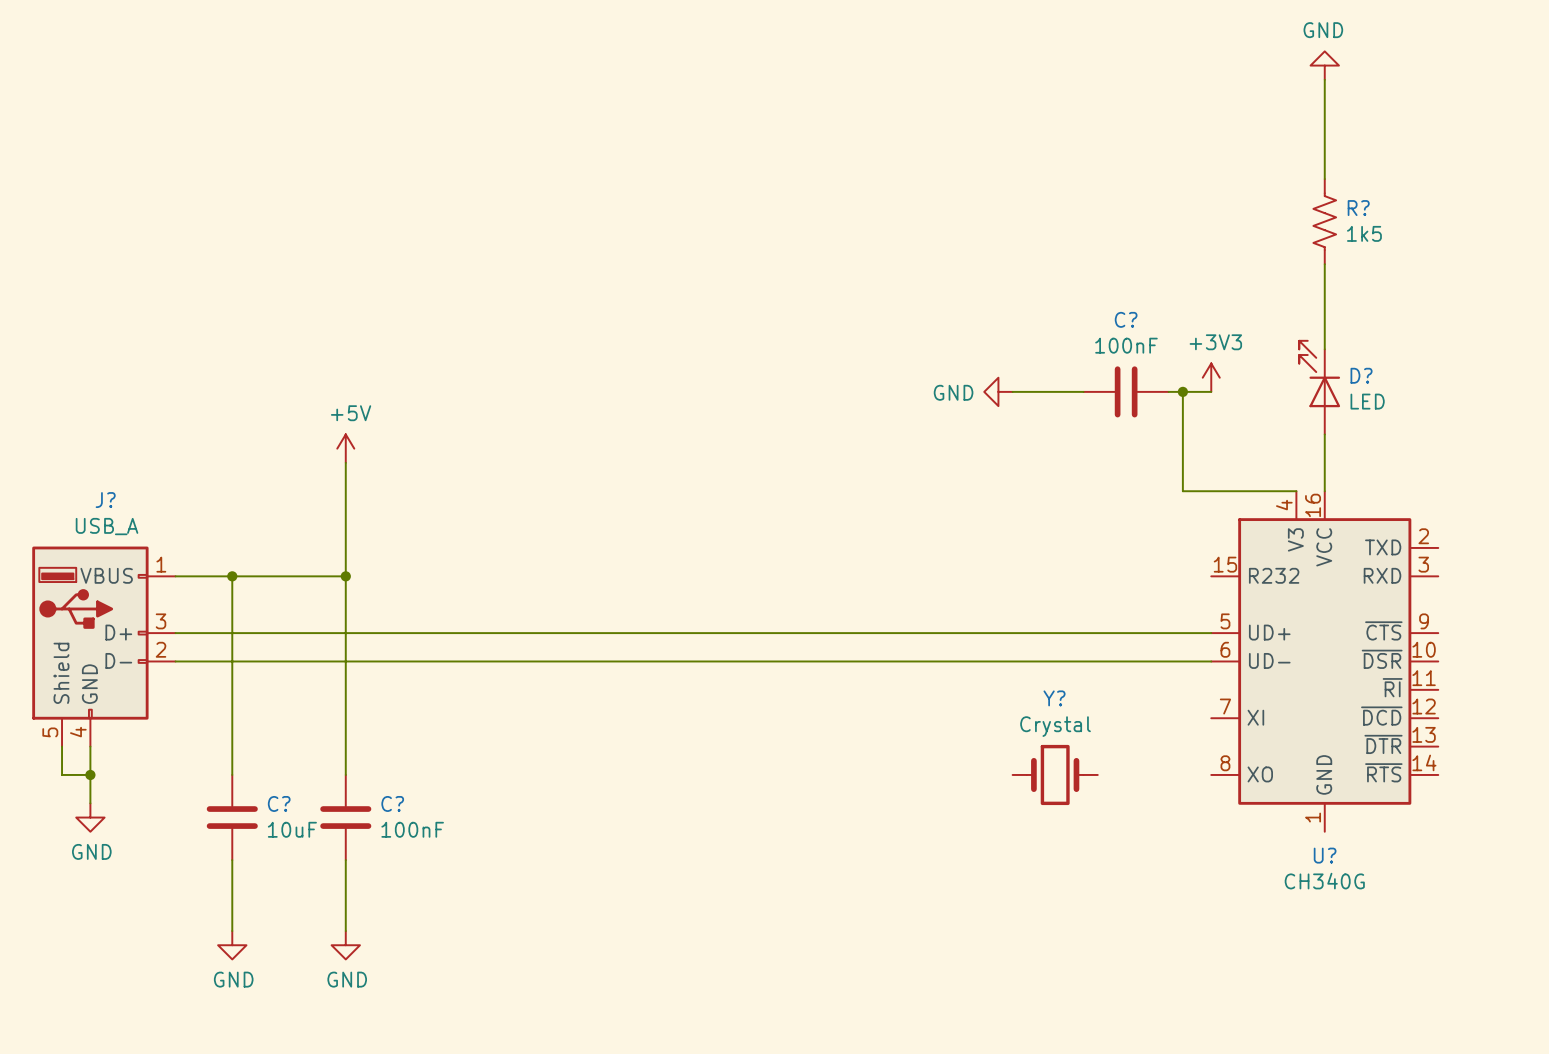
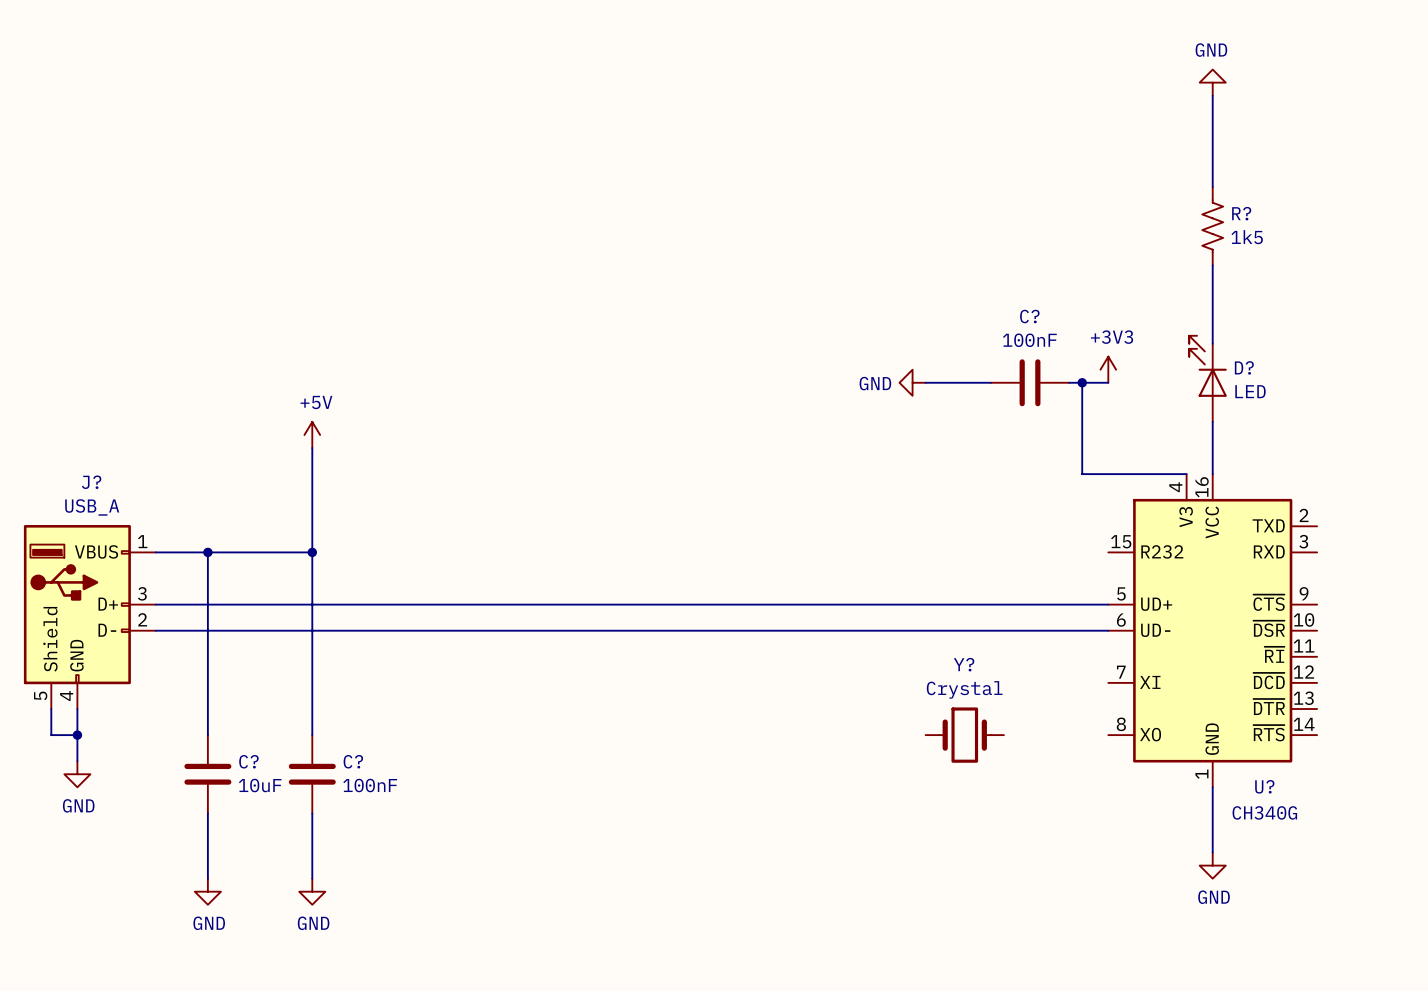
wire: none -> (1212, 787) (1212, 852)
U? name position: U? (1325, 855) -> U? (1264, 786)
U? value position: CH340G (1324, 881) -> CH340G (1264, 812)
power symbol: none -> GND (1212, 865)

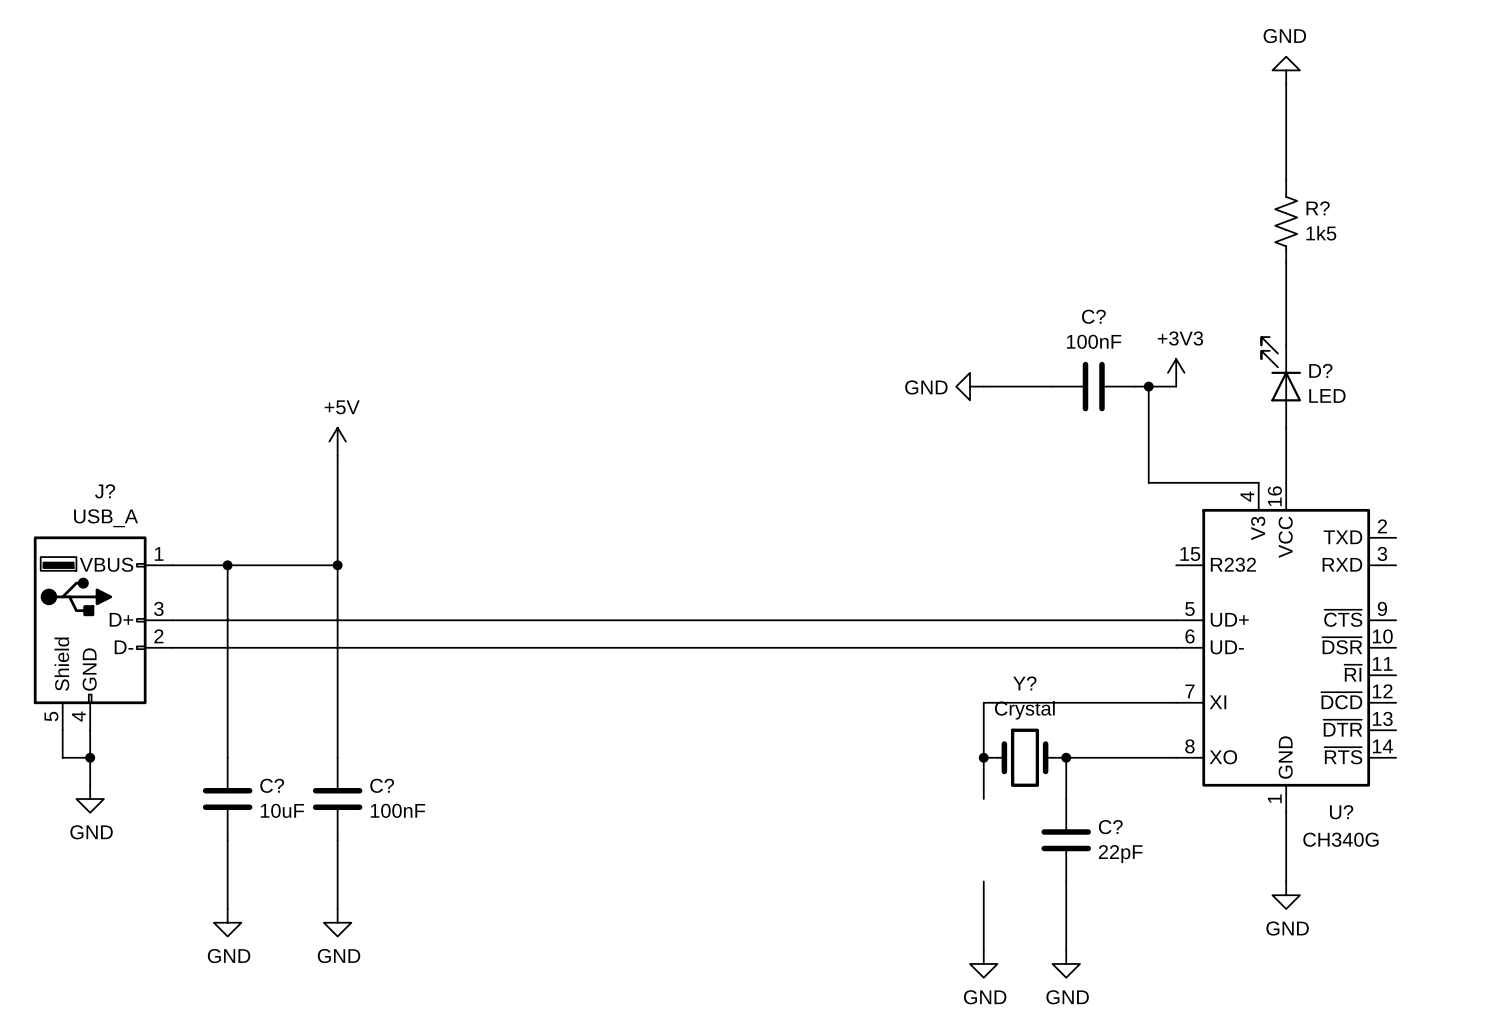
wire: none -> (1176, 702) (983, 702) (983, 799)
junction: none -> (983, 757)
junction: none -> (1066, 757)
wire: none -> (1176, 757) (1066, 757) (1066, 799)
C?: none -> 22pF (1066, 840)
wire: none -> (983, 881) (983, 950)
wire: none -> (1066, 881) (1066, 950)
power symbol: none -> GND (983, 963)
power symbol: none -> GND (1066, 963)

